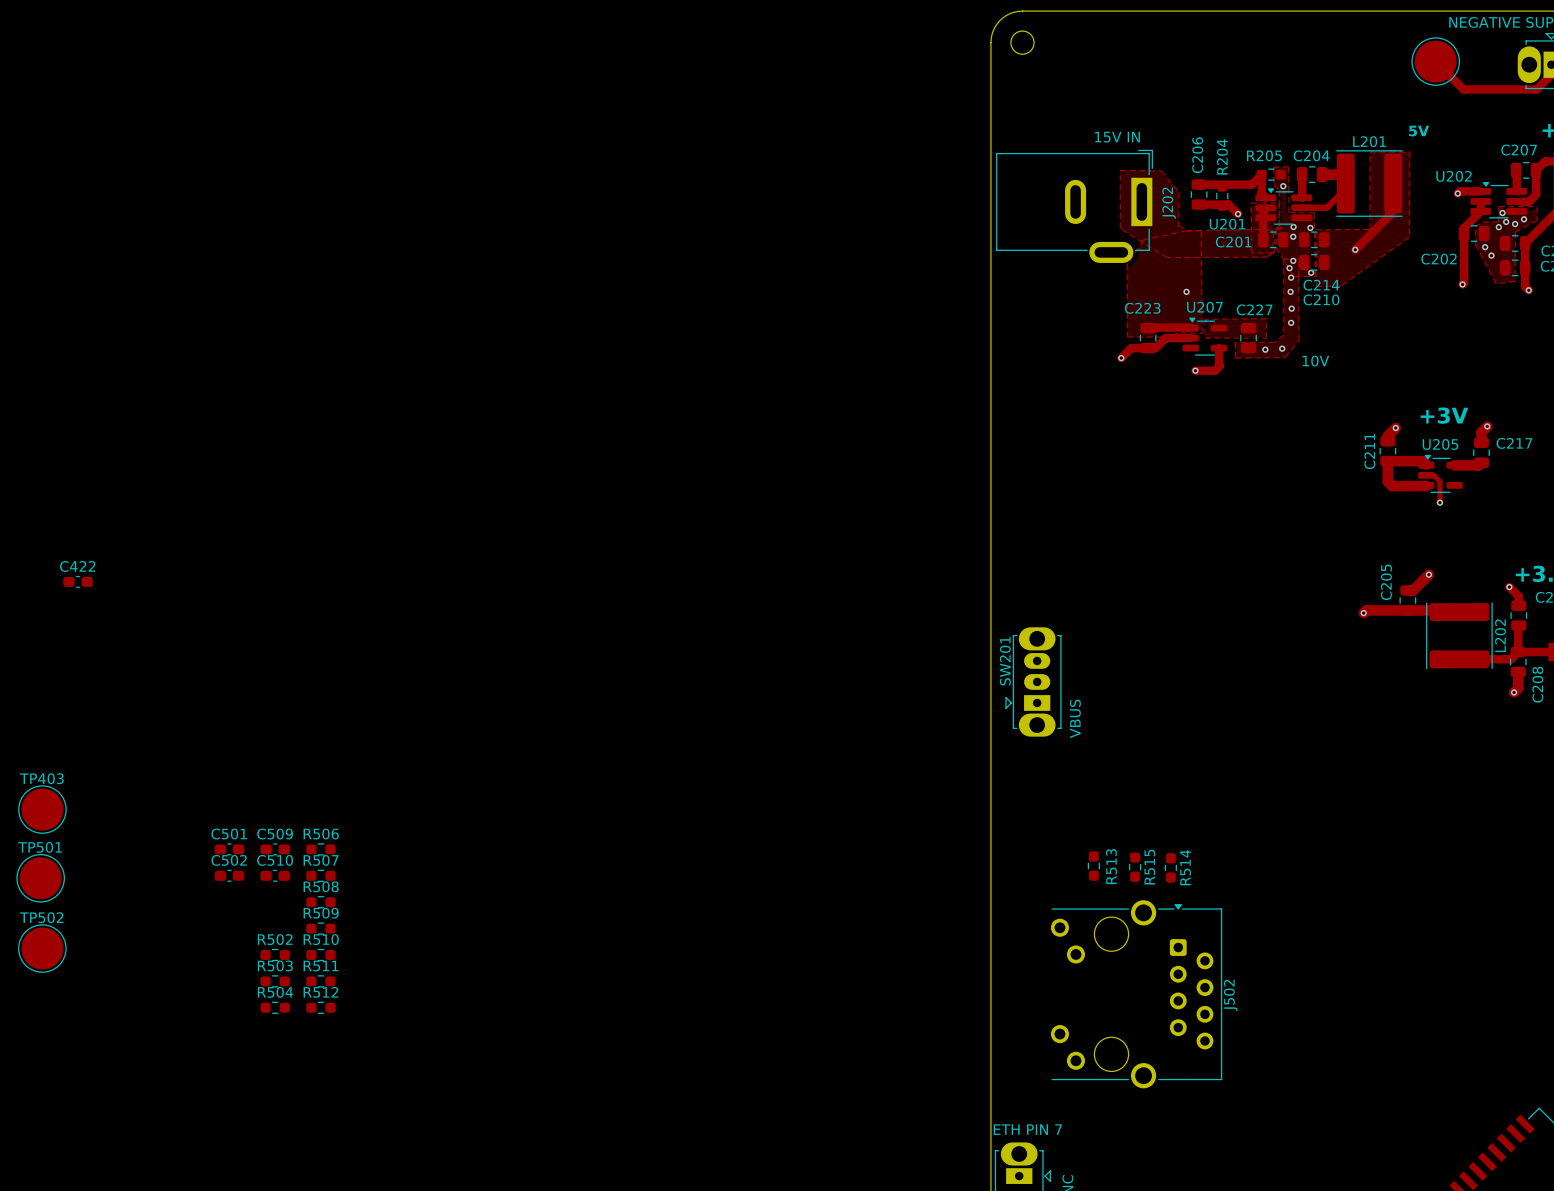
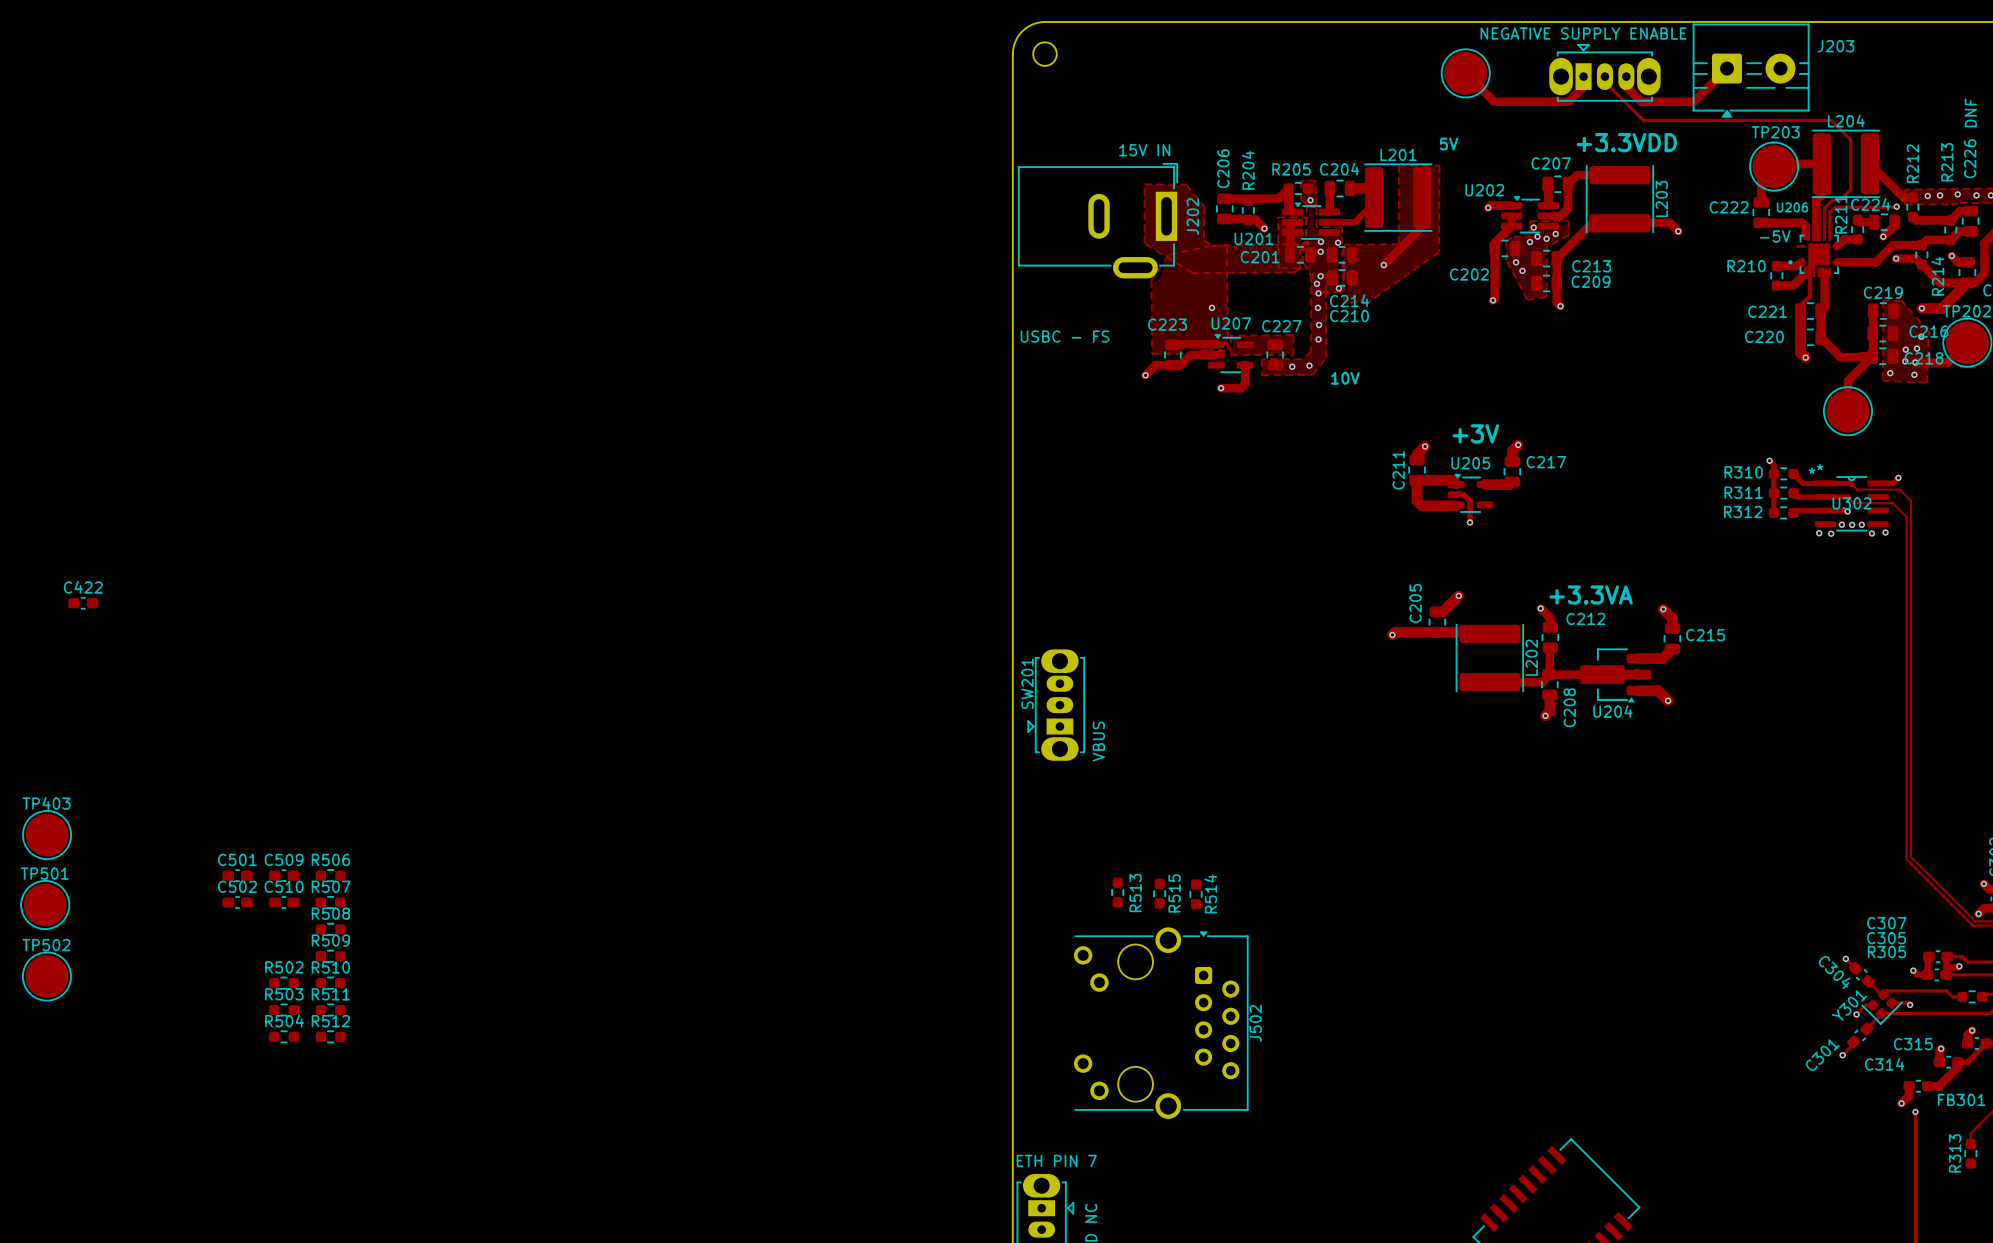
text: none -> USBC - FS (1065, 336)

